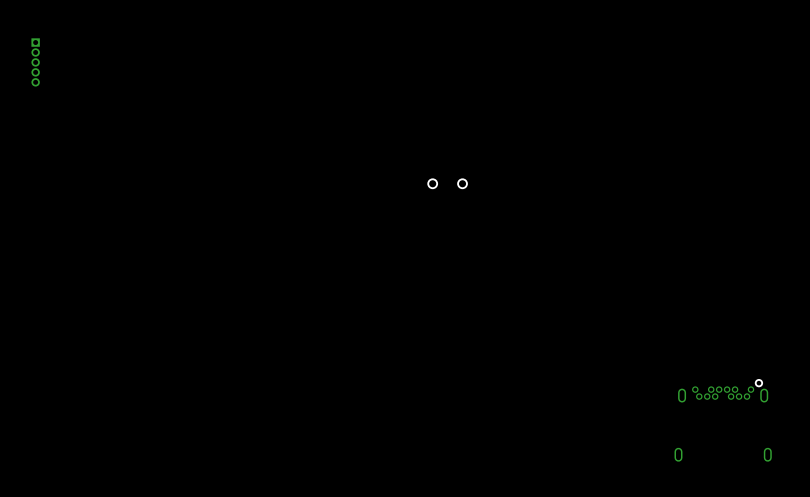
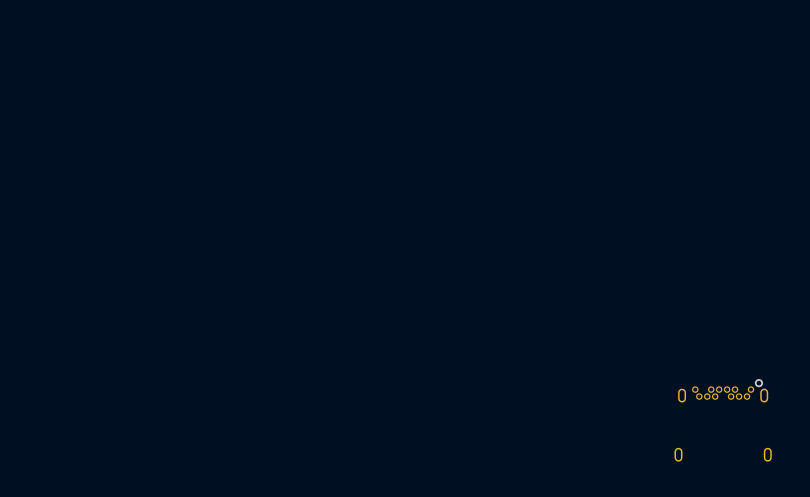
part: (35, 62) -> none
part: (447, 183) -> none

